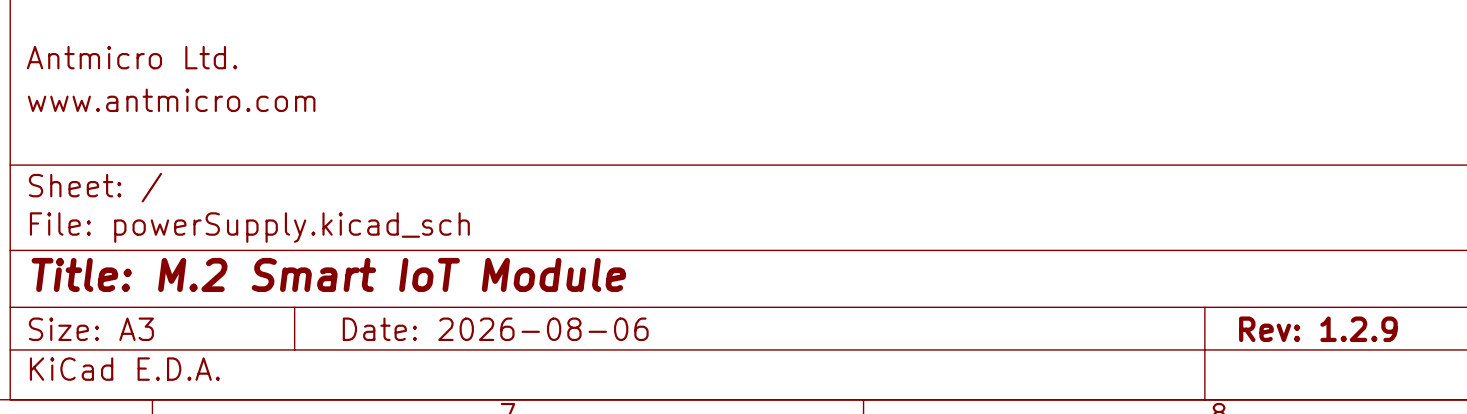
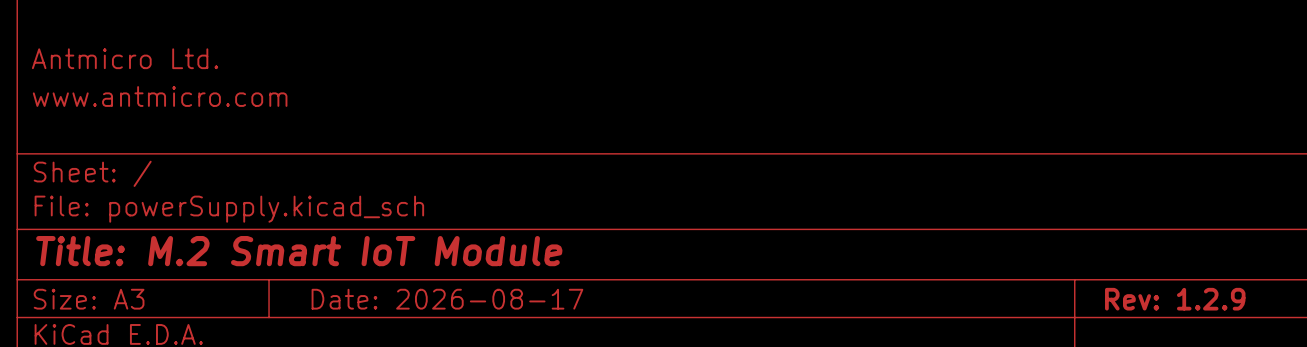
title block: Date: 2026-08-06 (495, 329) -> Date: 2026-08-17 (447, 299)

